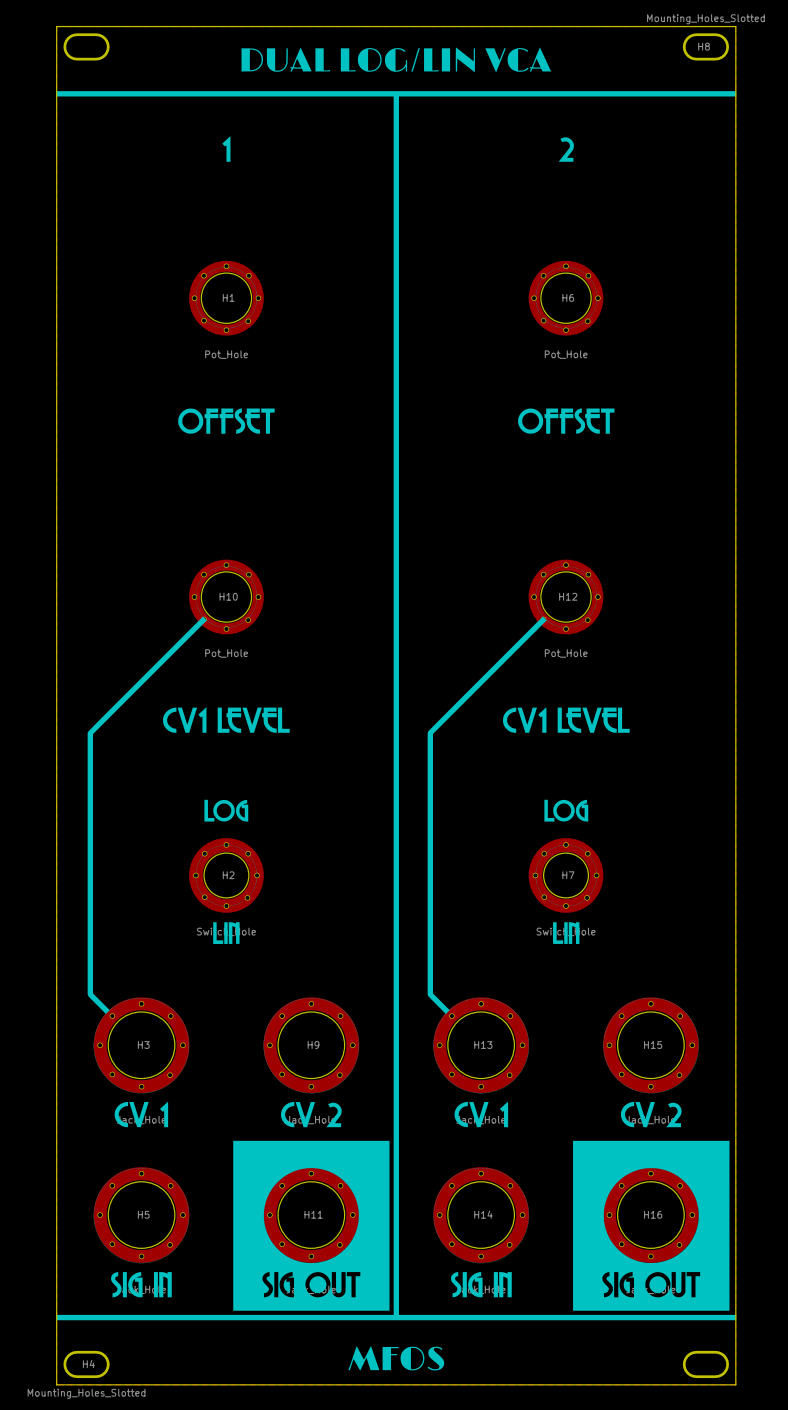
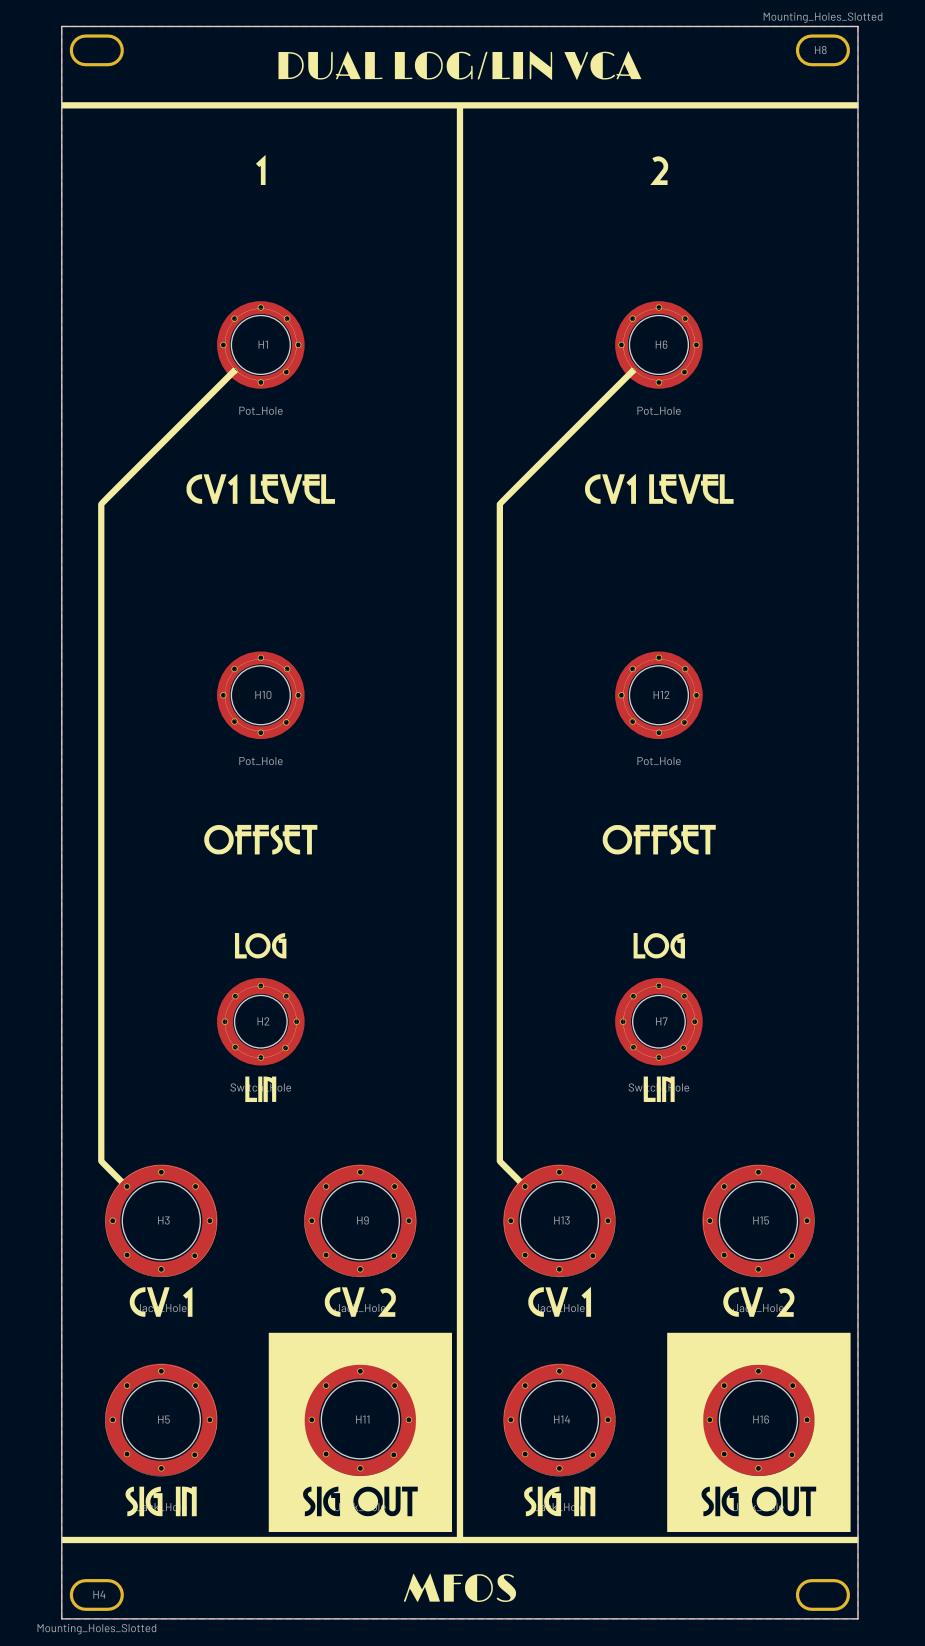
drawing shape: [56, 47, 737, 1371] -> [61, 50, 859, 1603]

